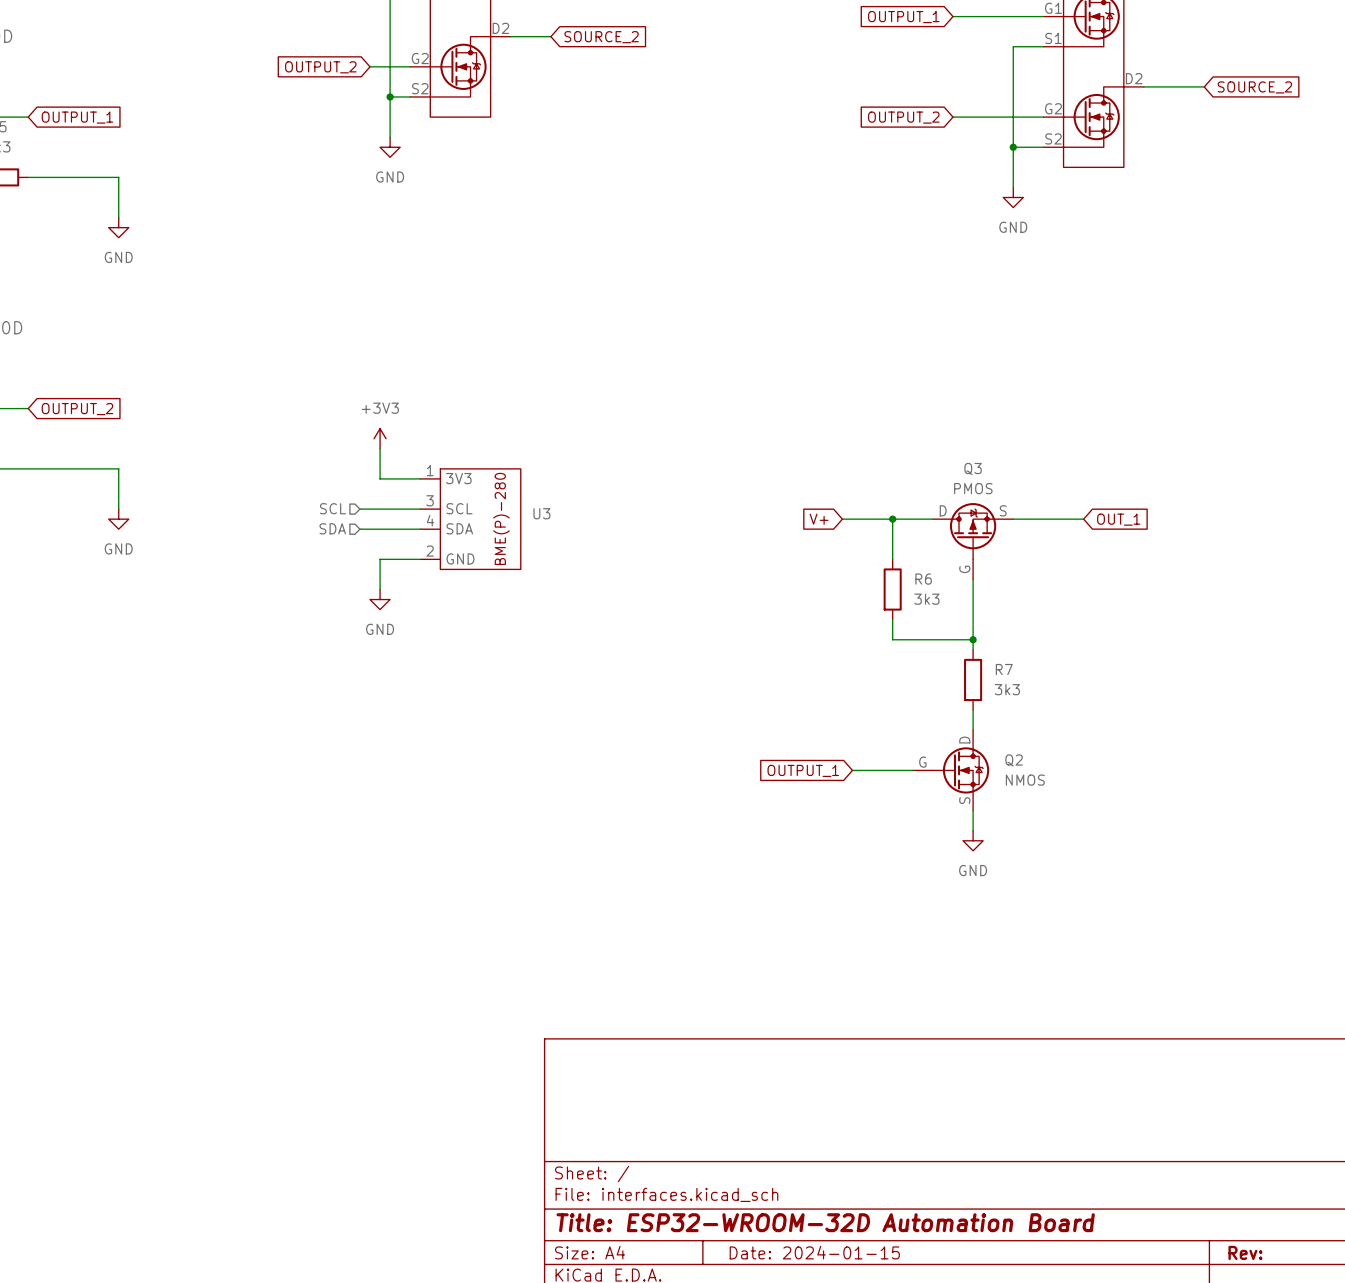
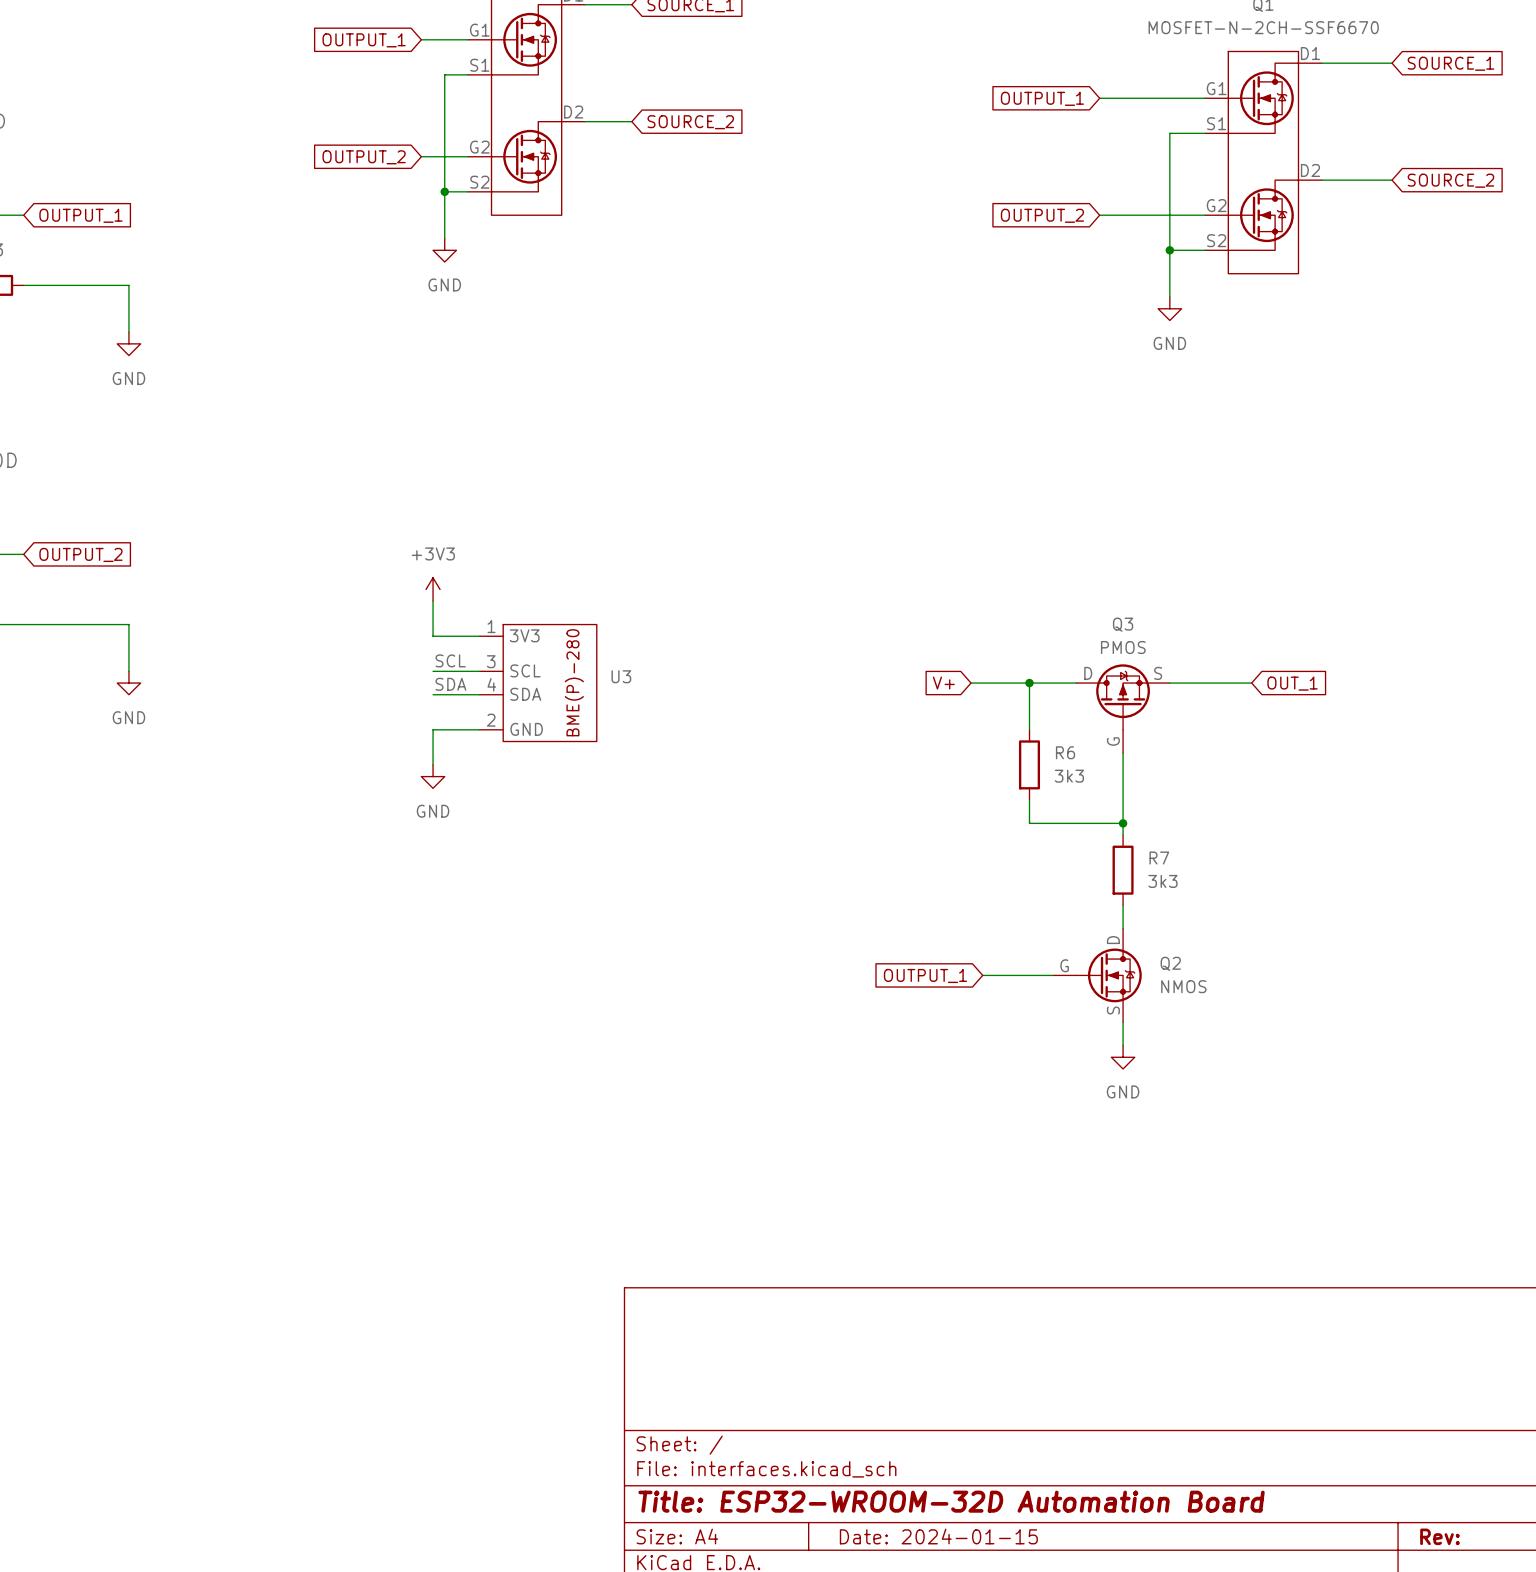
label: none -> SCL (450, 660)
hierarchical label: SCL (332, 508) -> none
wire: (359, 509) (380, 509) -> none
label: none -> SDA (450, 684)
hierarchical label: SDA (332, 528) -> none
wire: (359, 529) (380, 529) -> none

